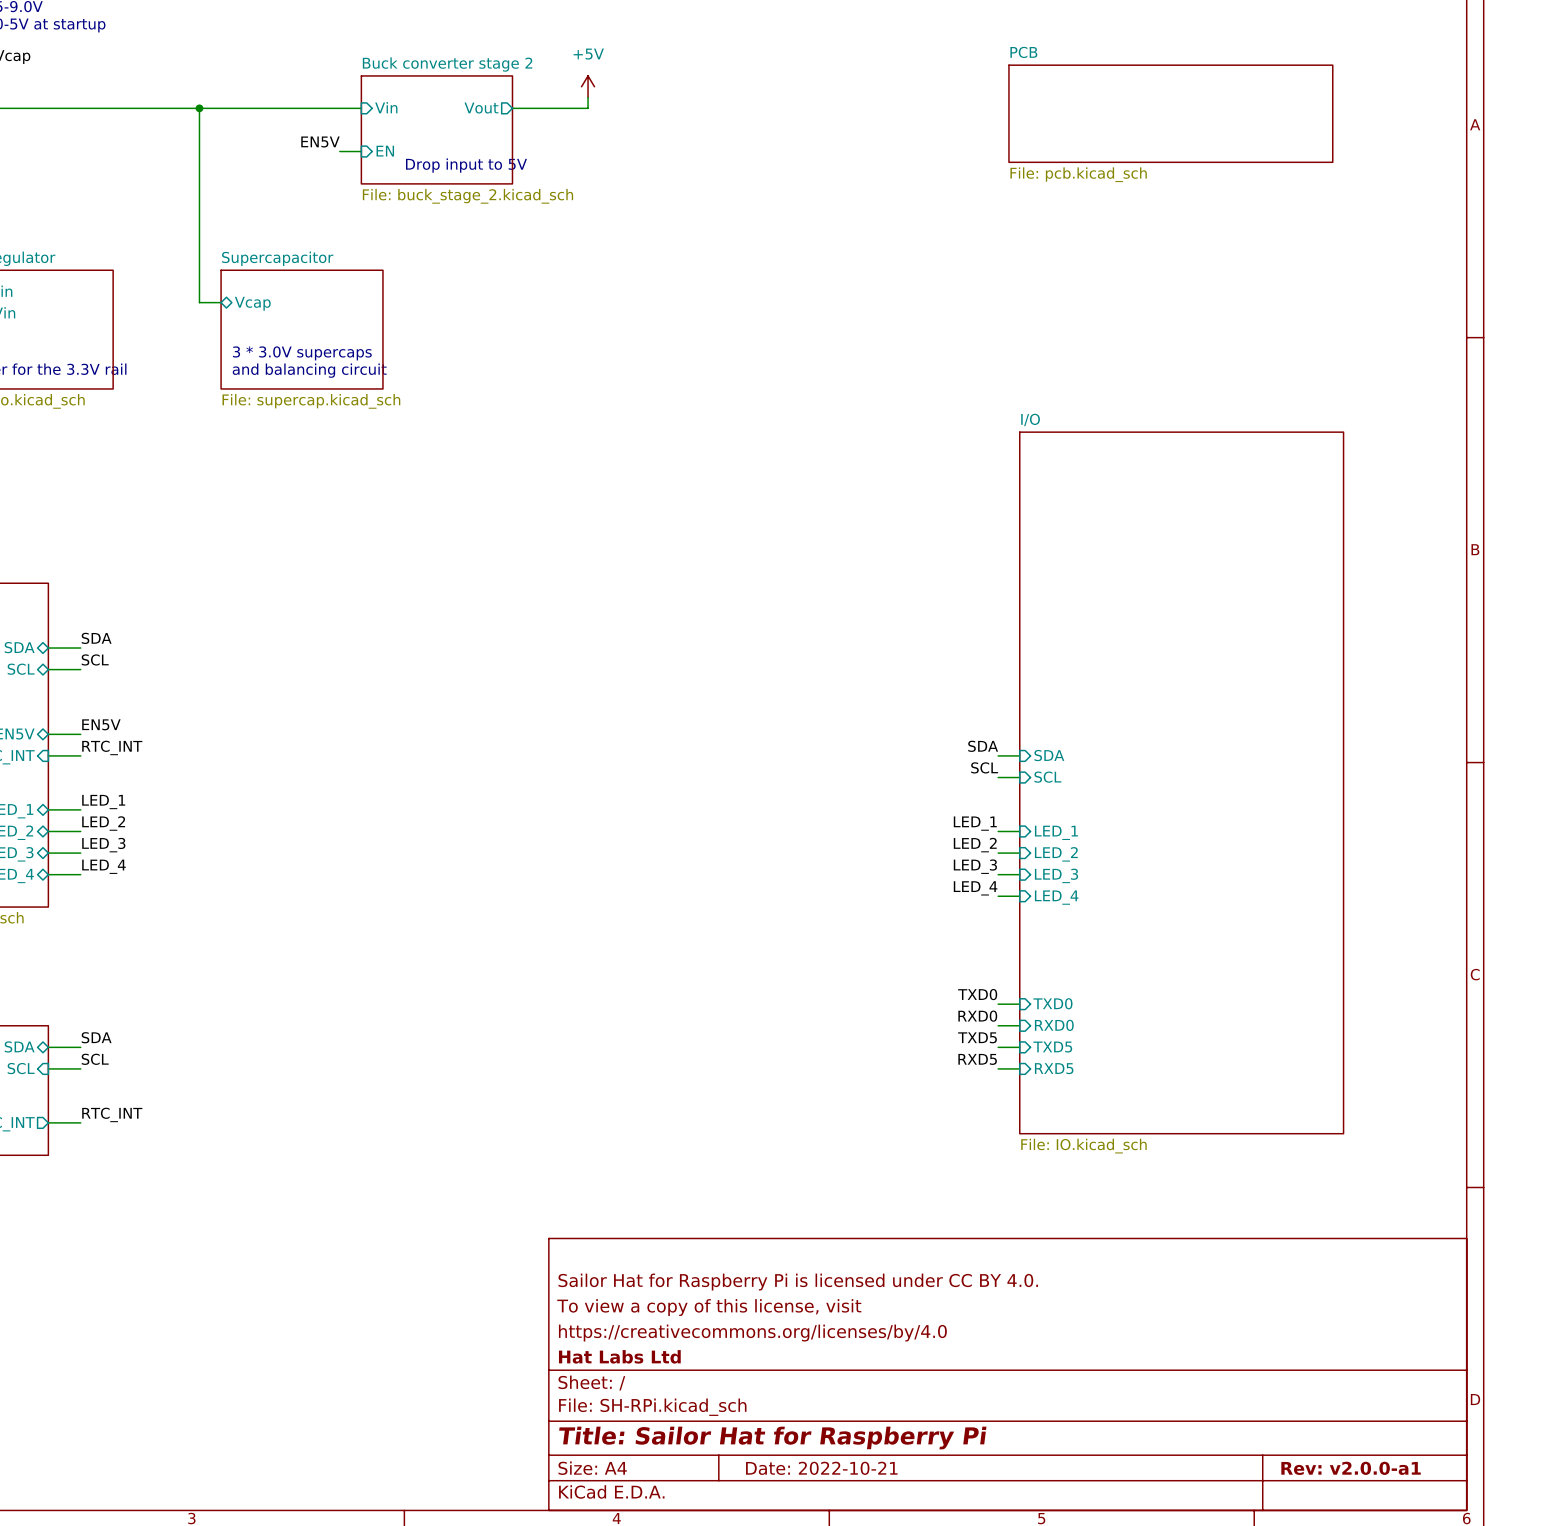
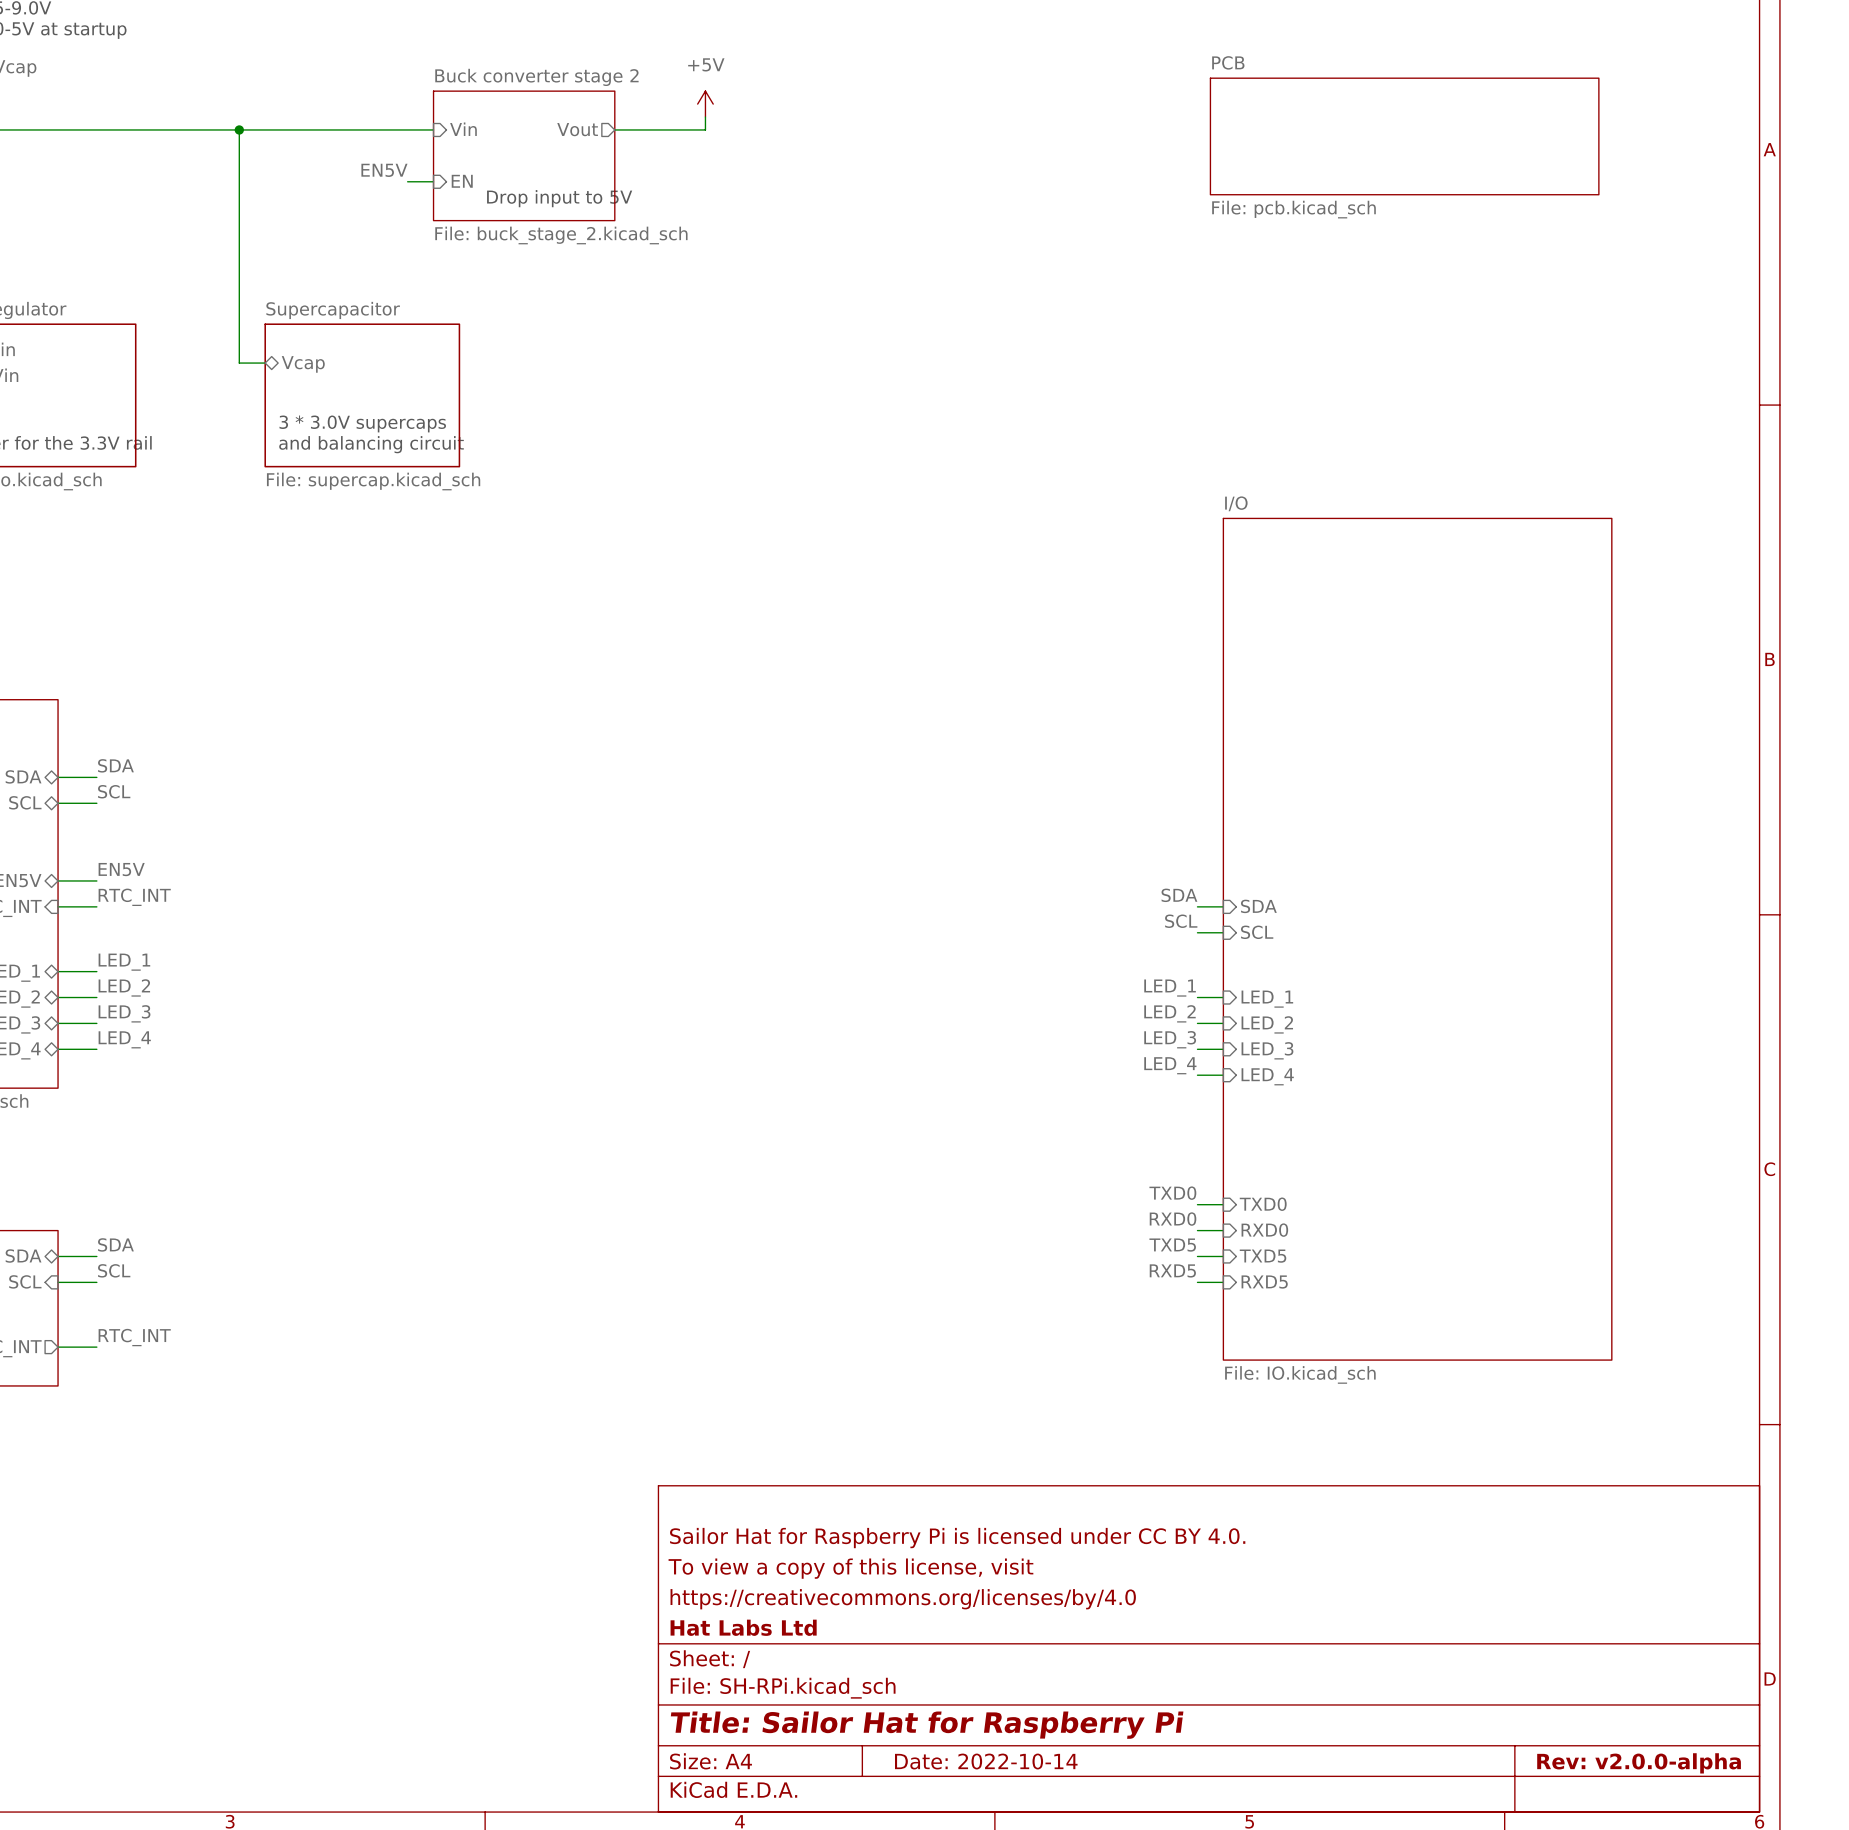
title block: Date: 2022-10-21 (821, 1468) -> Date: 2022-10-14 (986, 1761)
title block: Rev: v2.0.0-a1 (1351, 1468) -> Rev: v2.0.0-alpha (1639, 1763)

